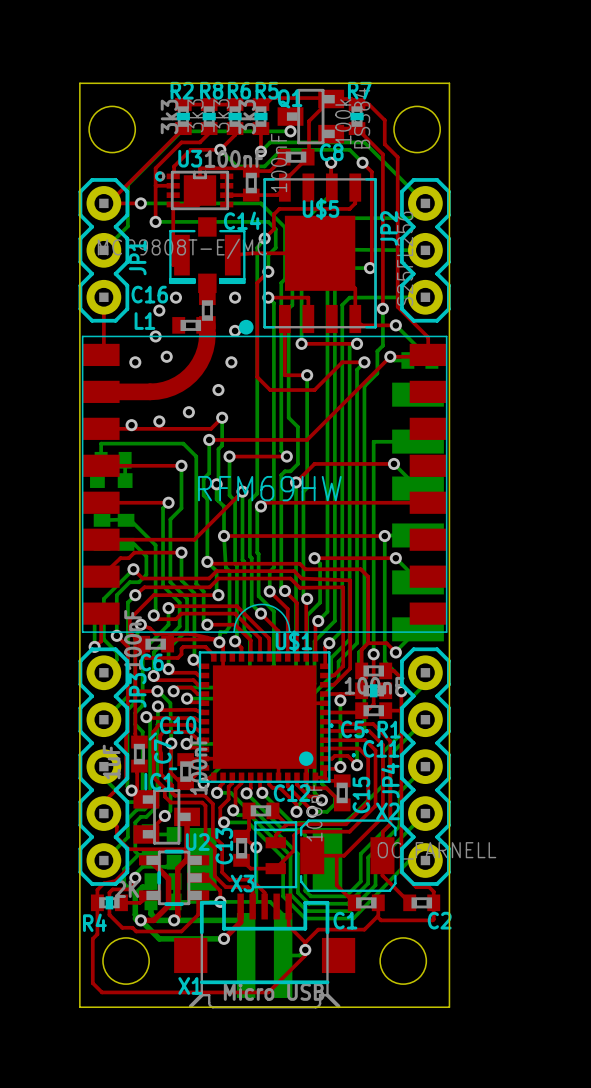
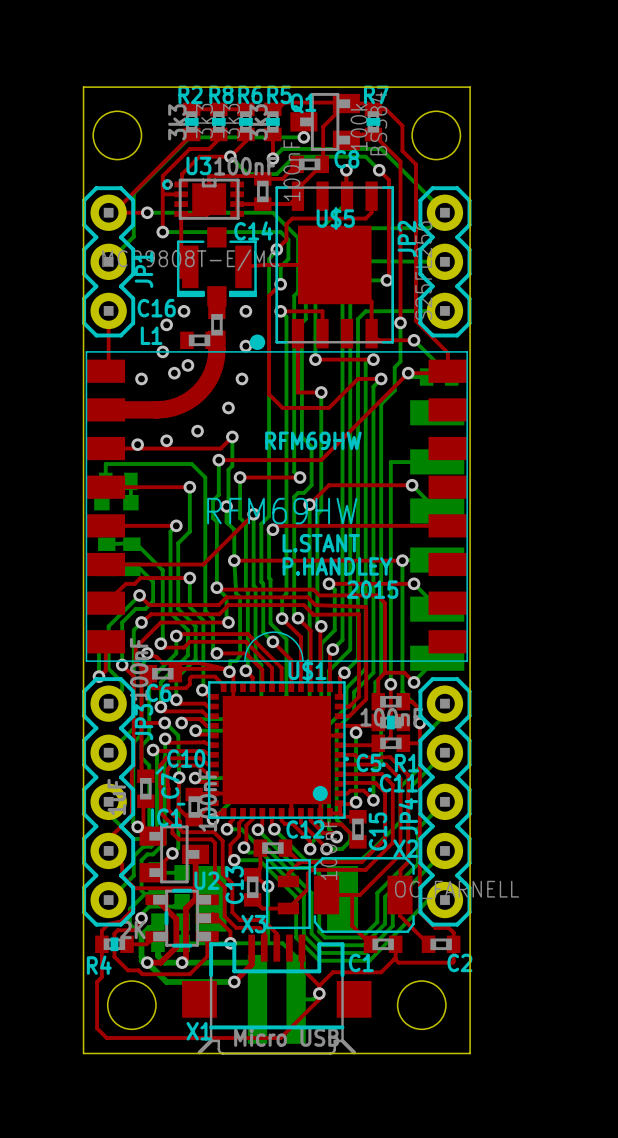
via: none -> (187, 365)
text: none -> RFM69HW (313, 440)
text: none -> L.STANT (321, 543)
text: none -> P.HANDLEY (337, 566)
text: none -> 2015 (372, 589)

